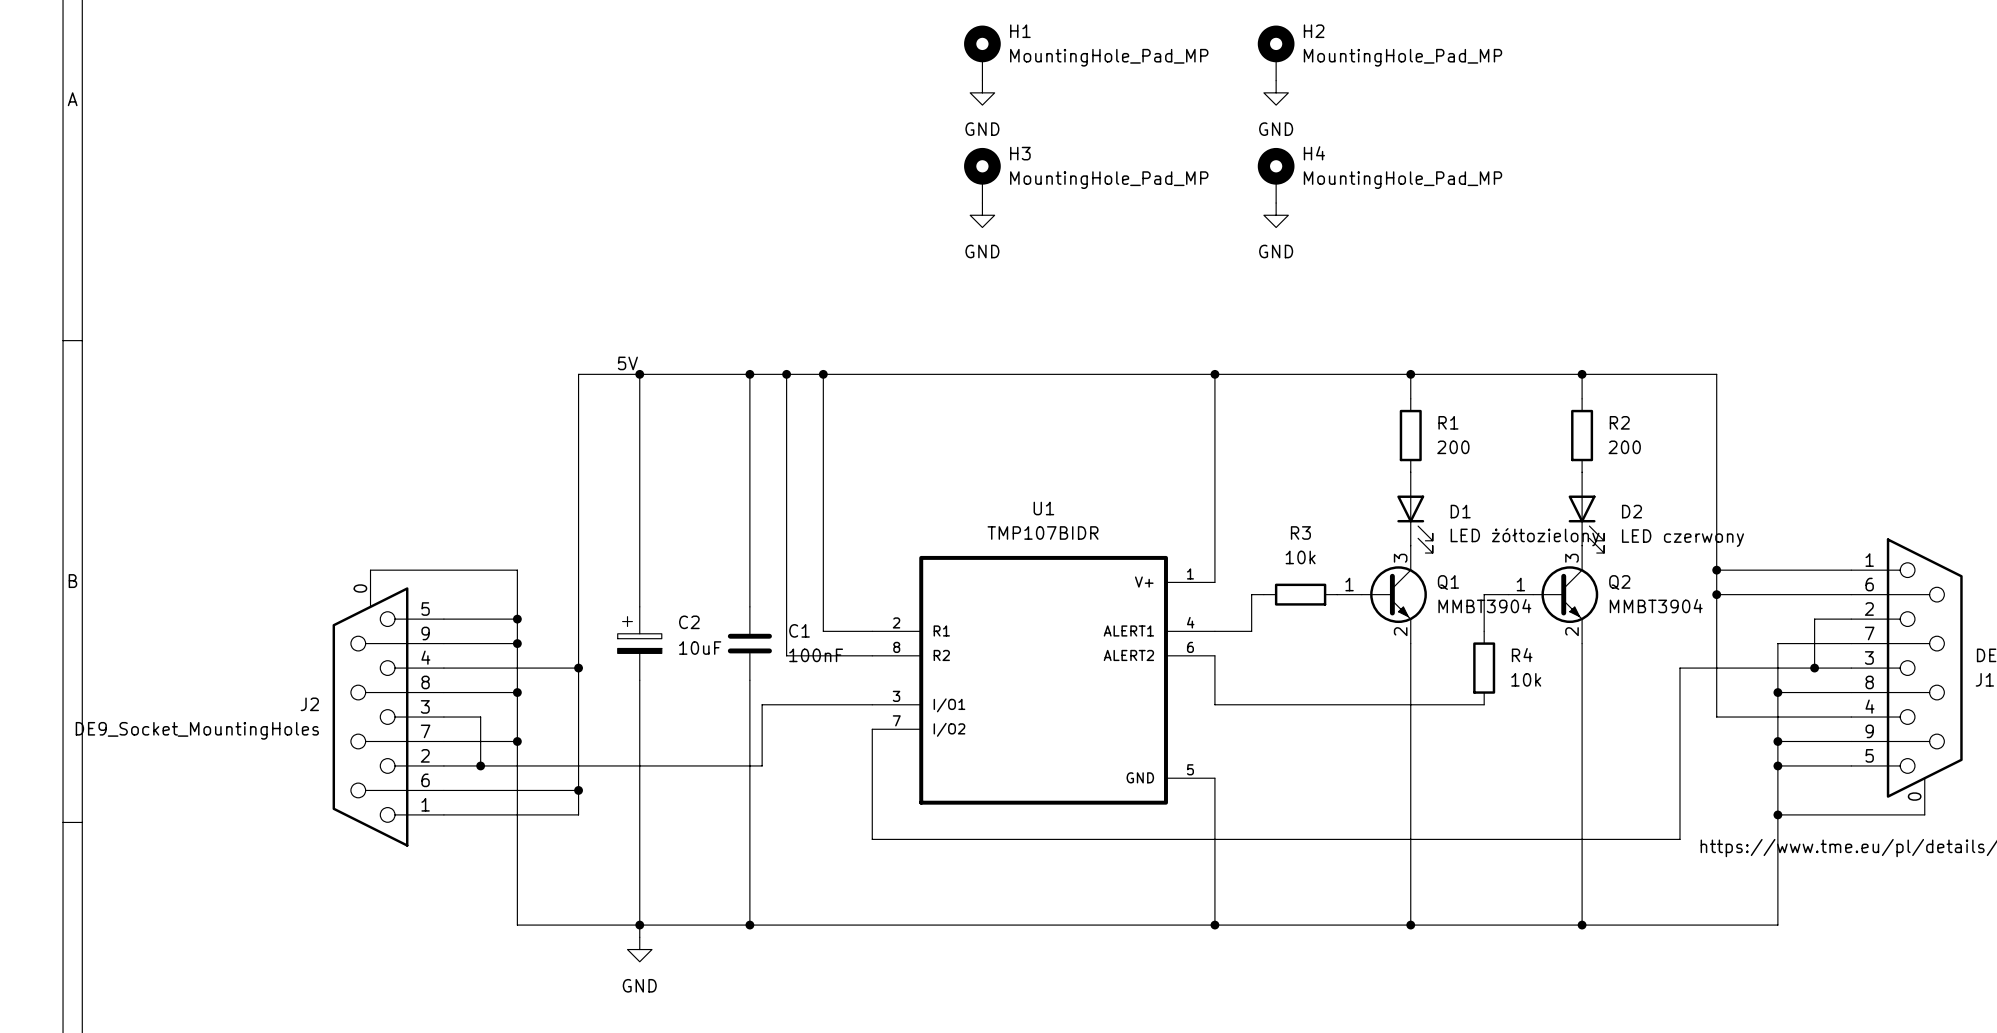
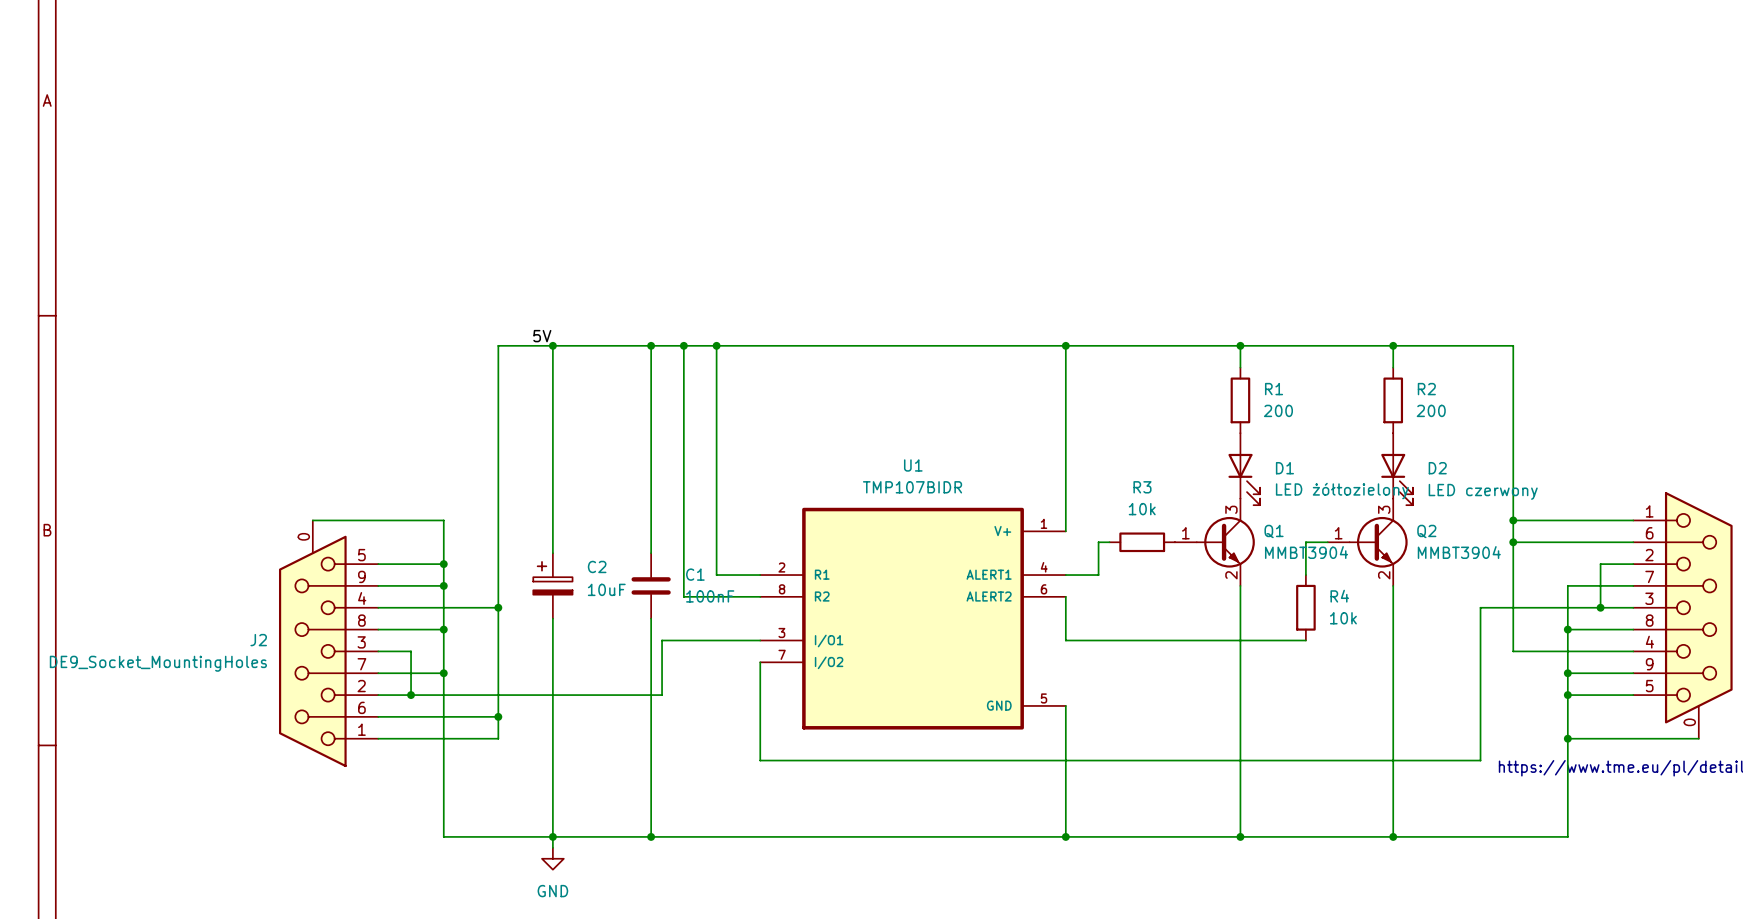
H1: MountingHole_Pad_MP (982, 53) -> none
H2: MountingHole_Pad_MP (1276, 53) -> none
power symbol: GND (982, 92) -> none
power symbol: GND (1276, 92) -> none
H3: MountingHole_Pad_MP (982, 175) -> none
H4: MountingHole_Pad_MP (1276, 175) -> none
power symbol: GND (982, 215) -> none
power symbol: GND (1276, 215) -> none

